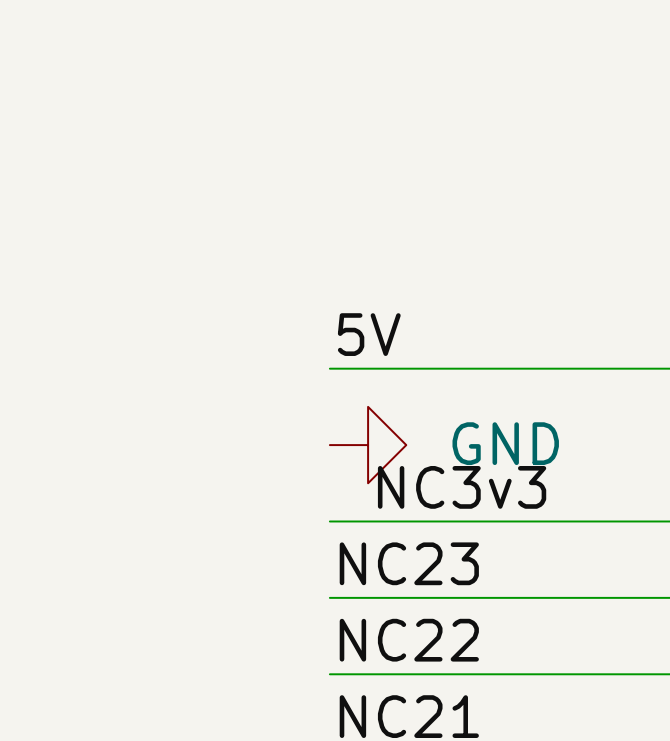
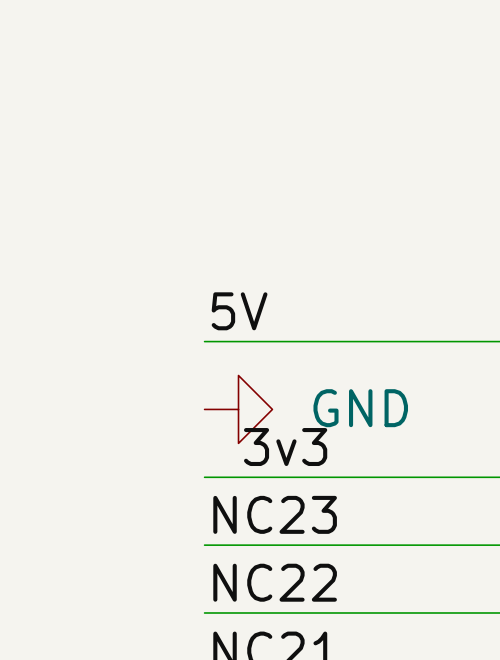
label: NC3v3 (462, 487) -> 3v3 (285, 447)

